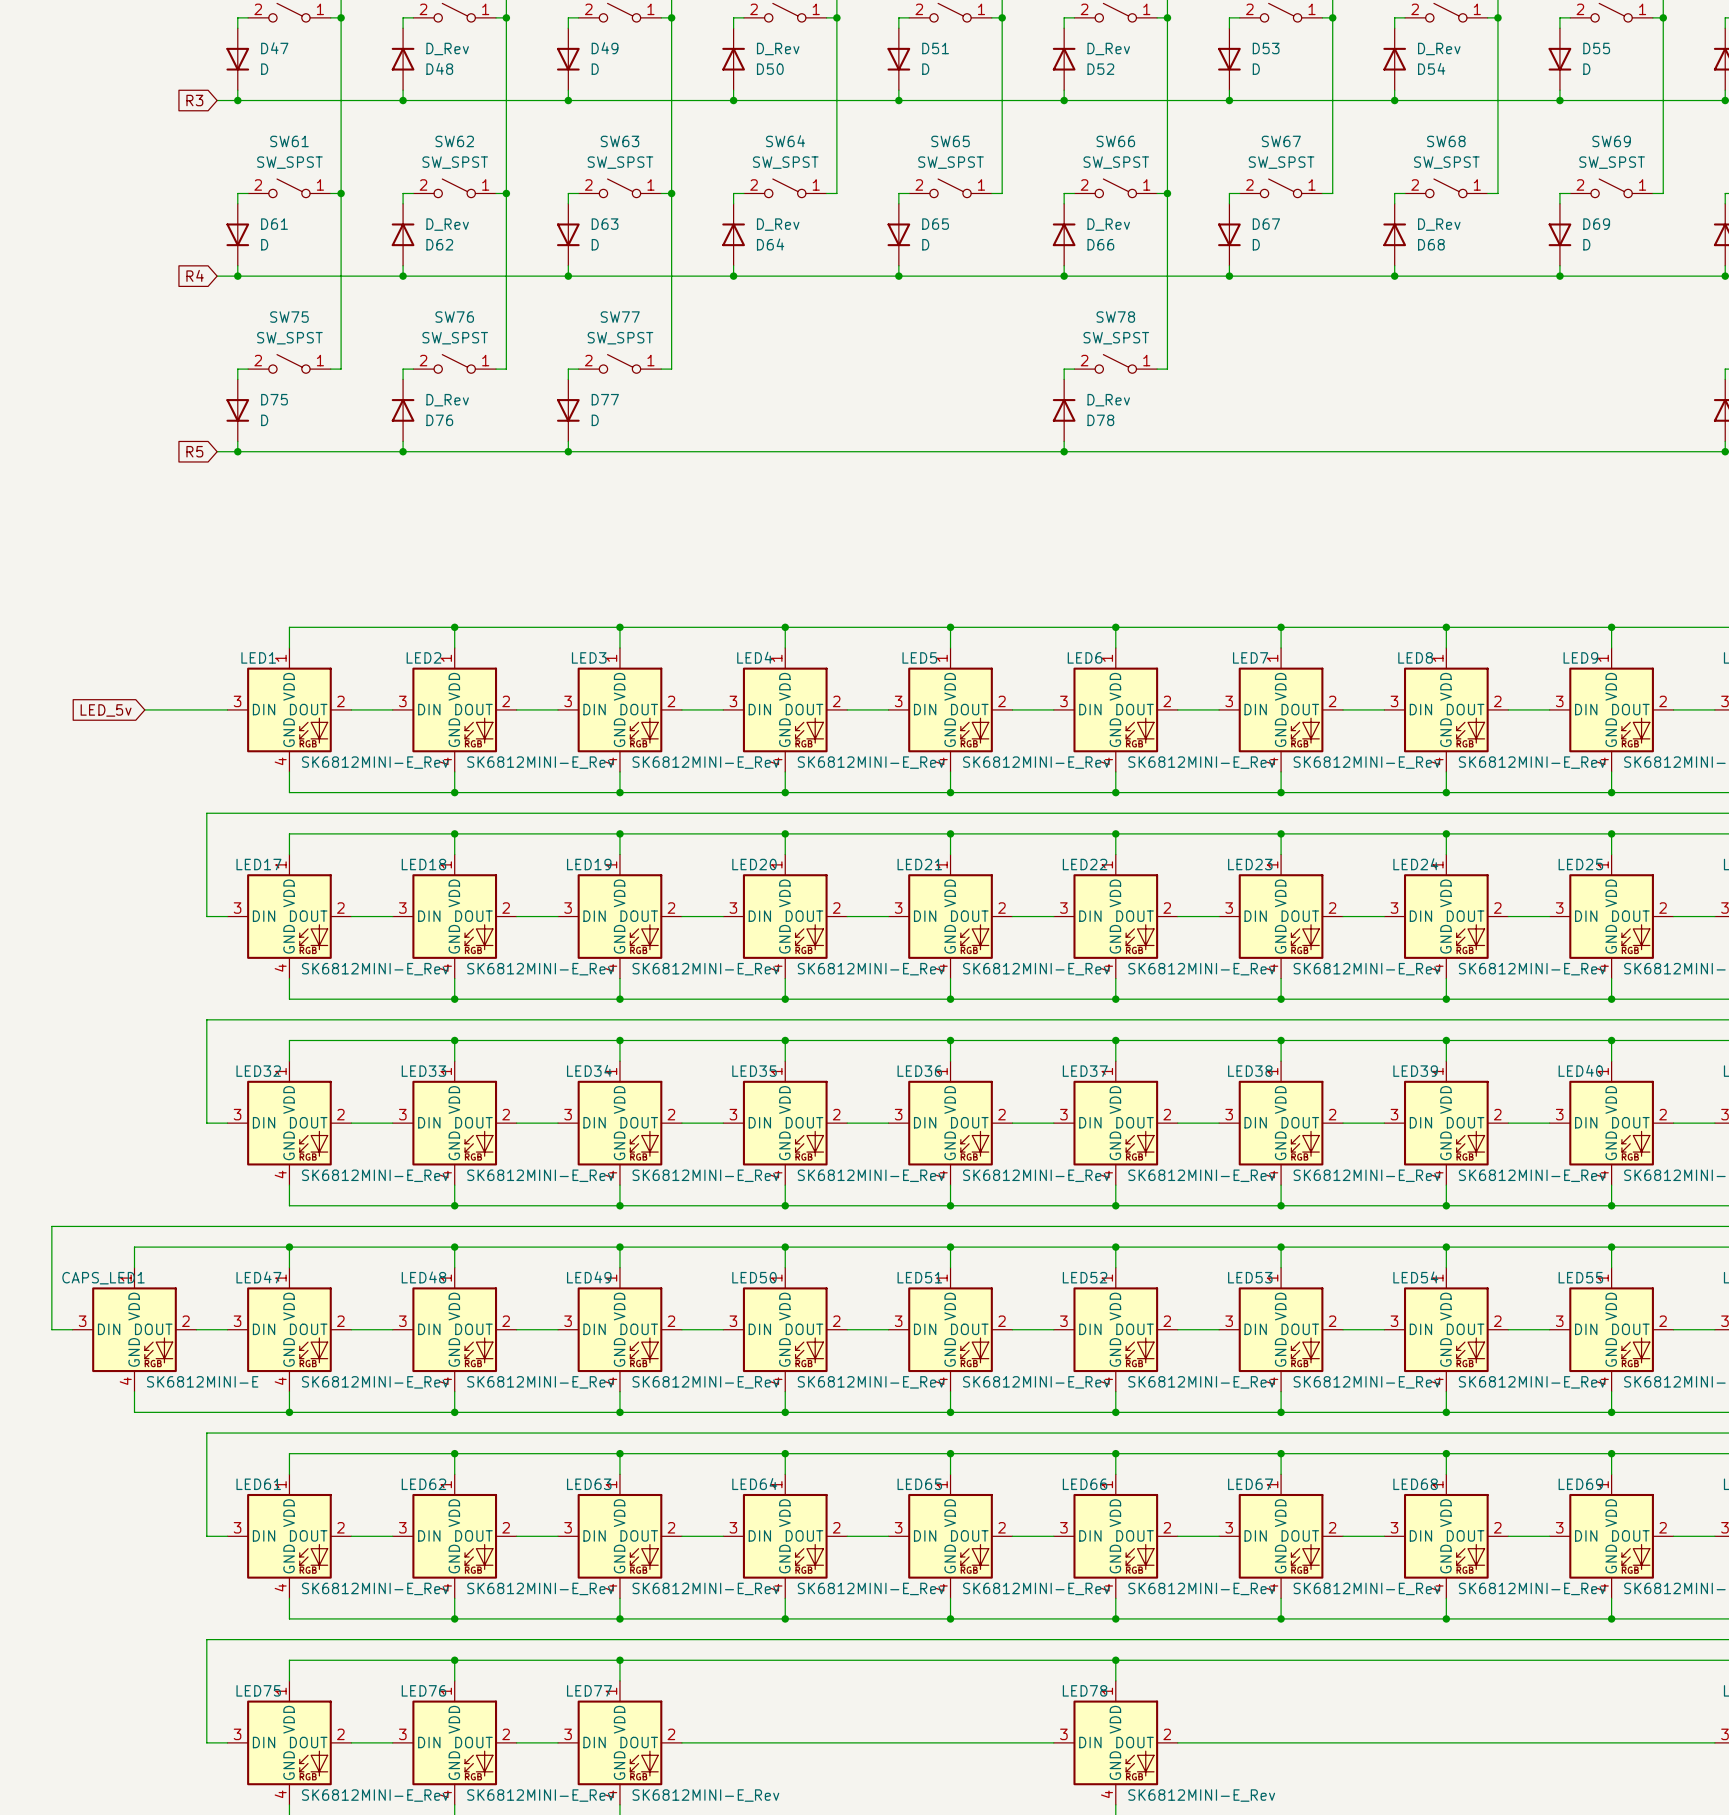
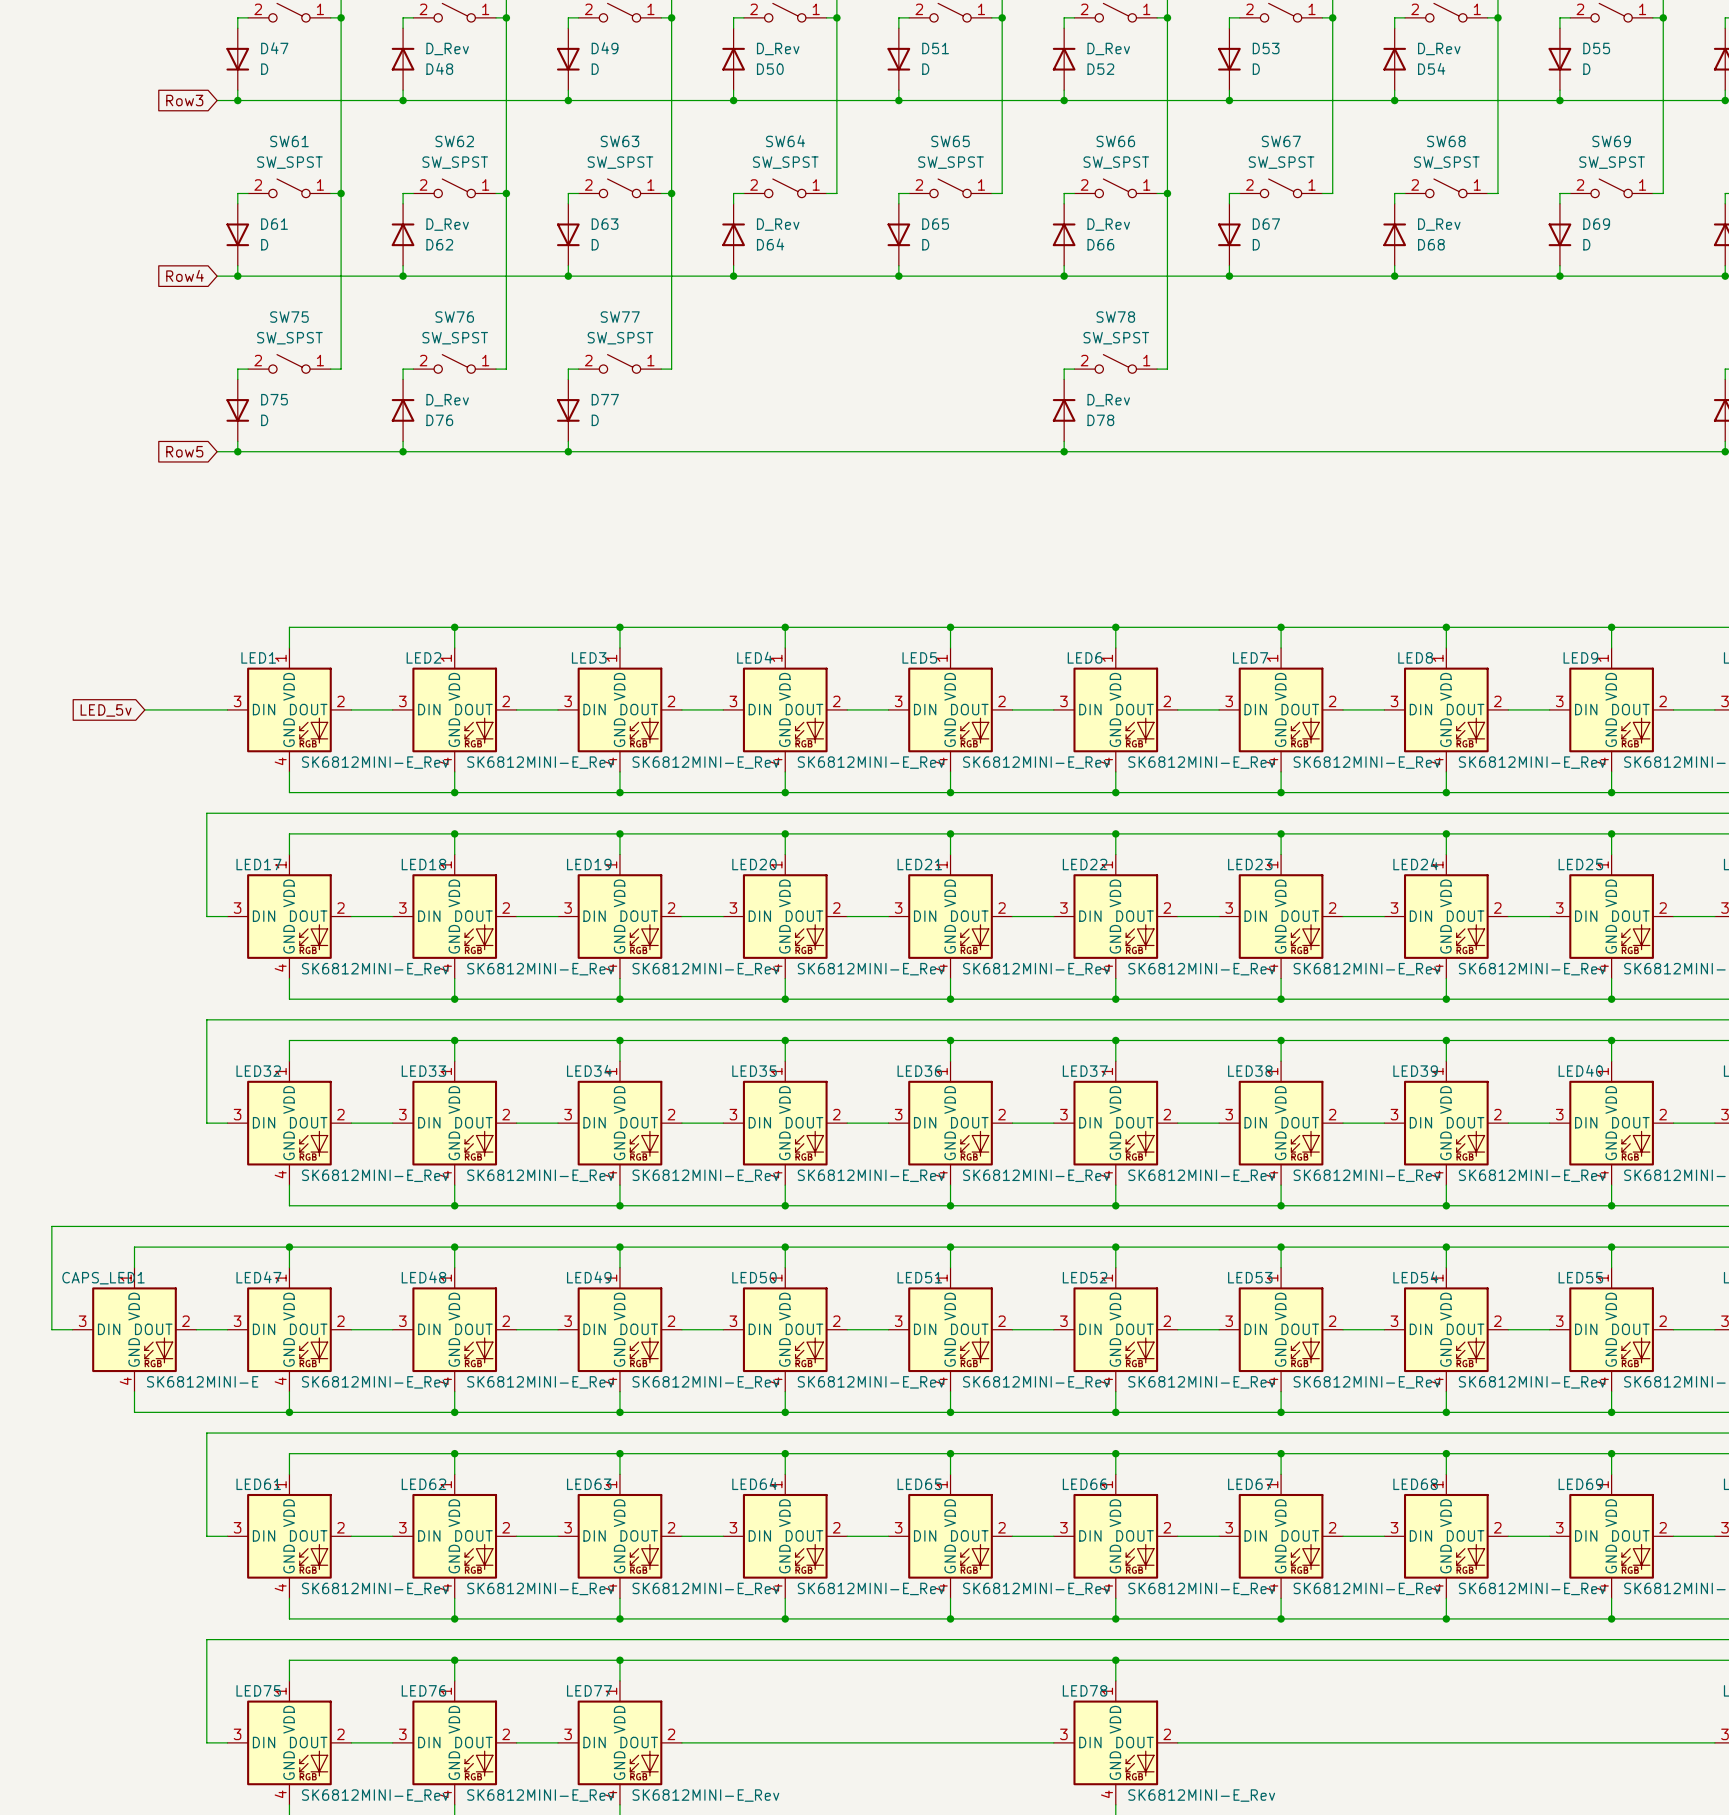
global label: R3 (194, 100) -> Row3 (184, 100)
global label: R4 (195, 275) -> Row4 (185, 275)
global label: R5 (194, 451) -> Row5 (184, 451)

